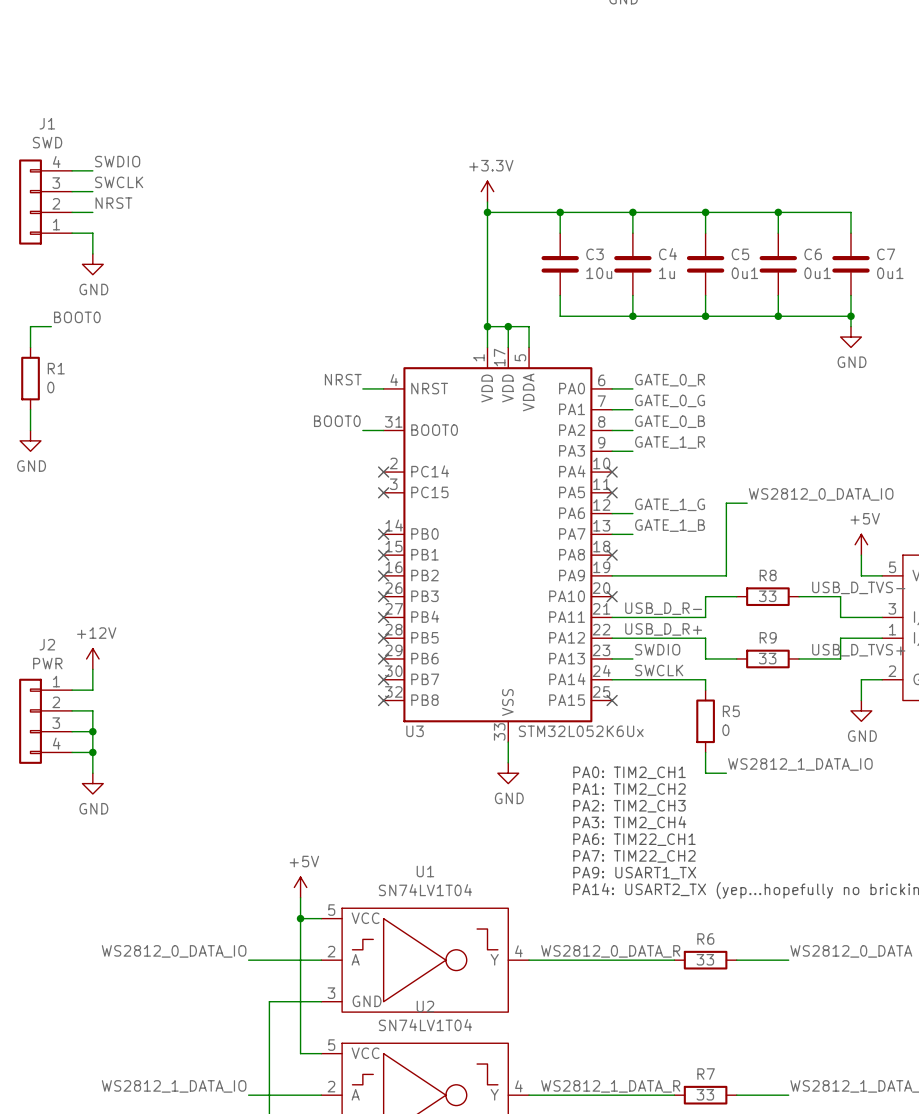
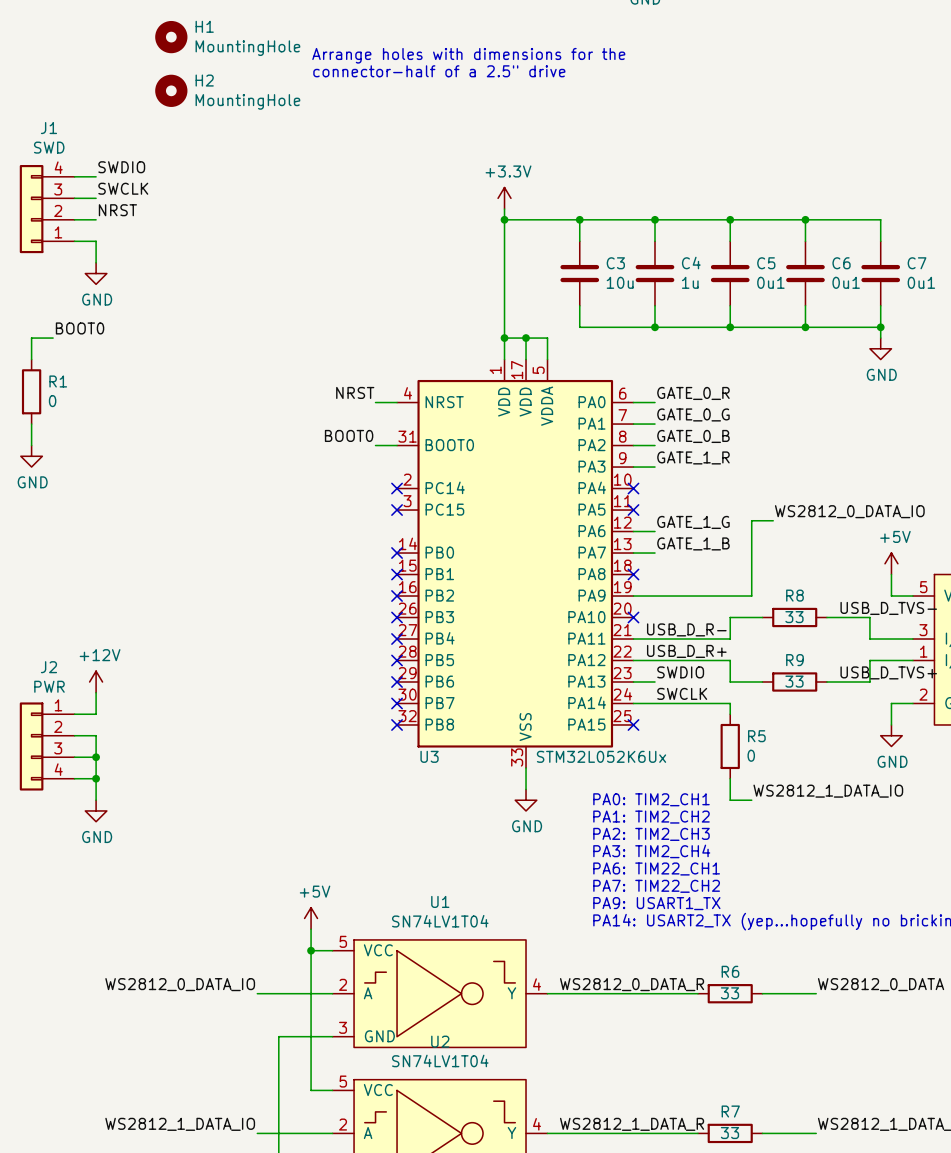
H1: none -> MountingHole (171, 37)
text: none -> Arrange holes with dimensions for the (468, 55)
text: none -> connector-half of a 2.5" drive (439, 71)
H2: none -> MountingHole (171, 90)

